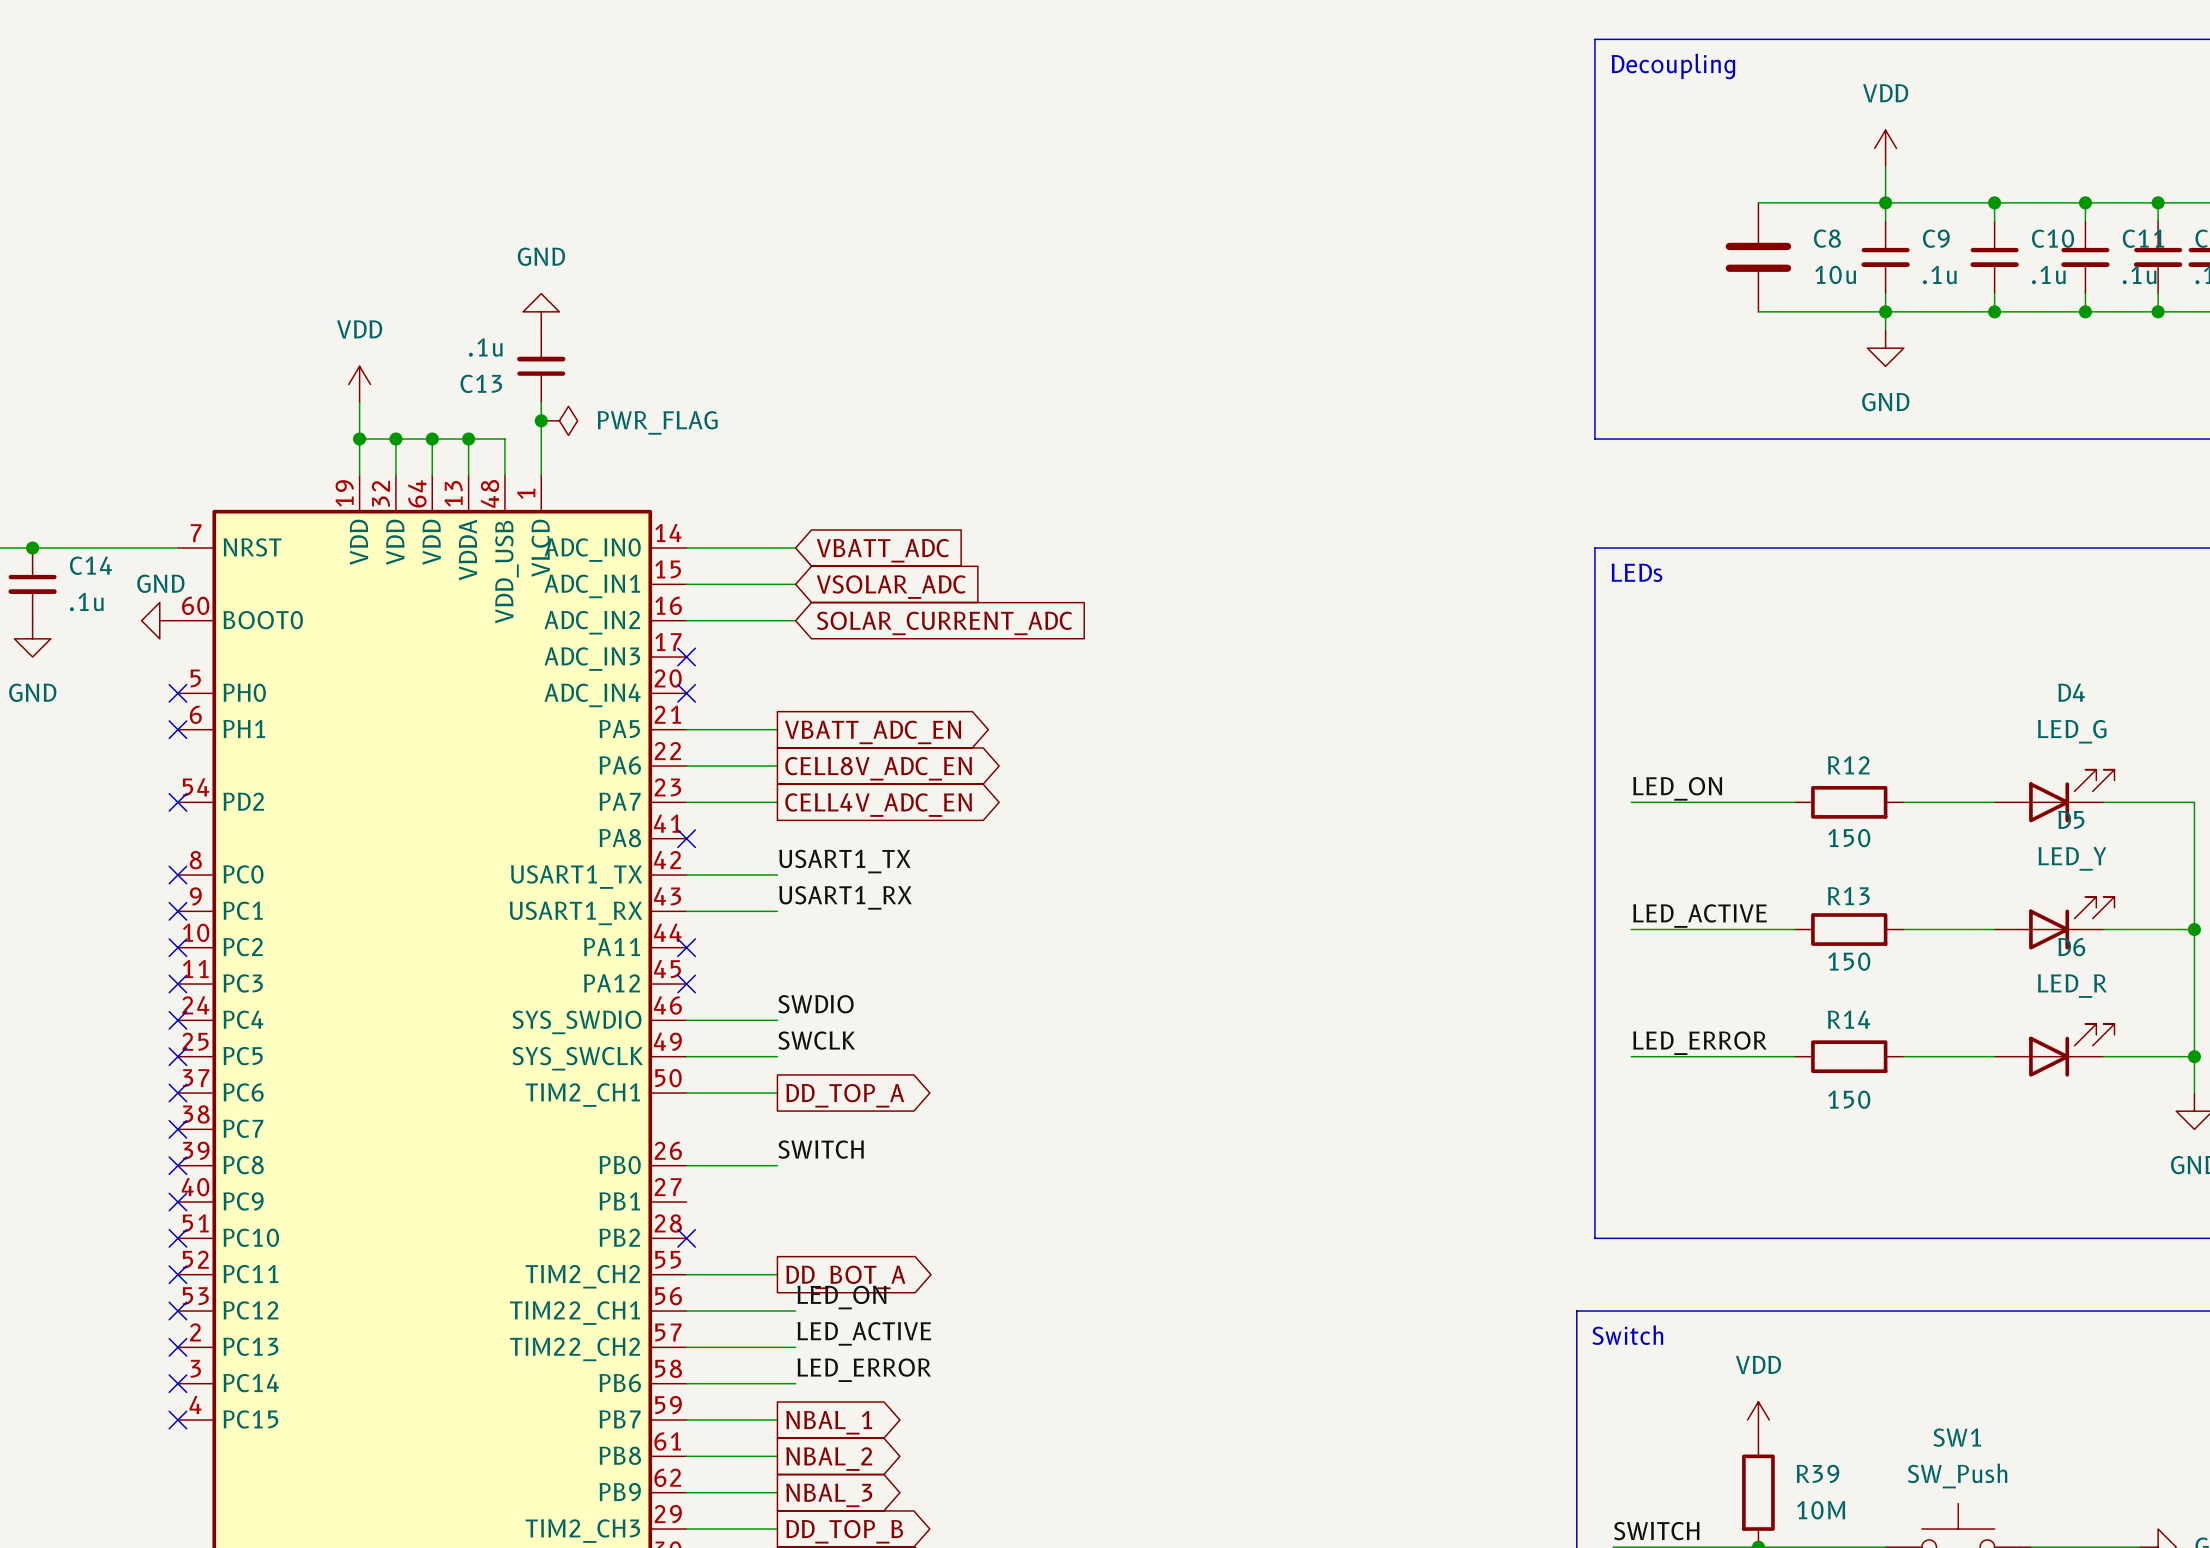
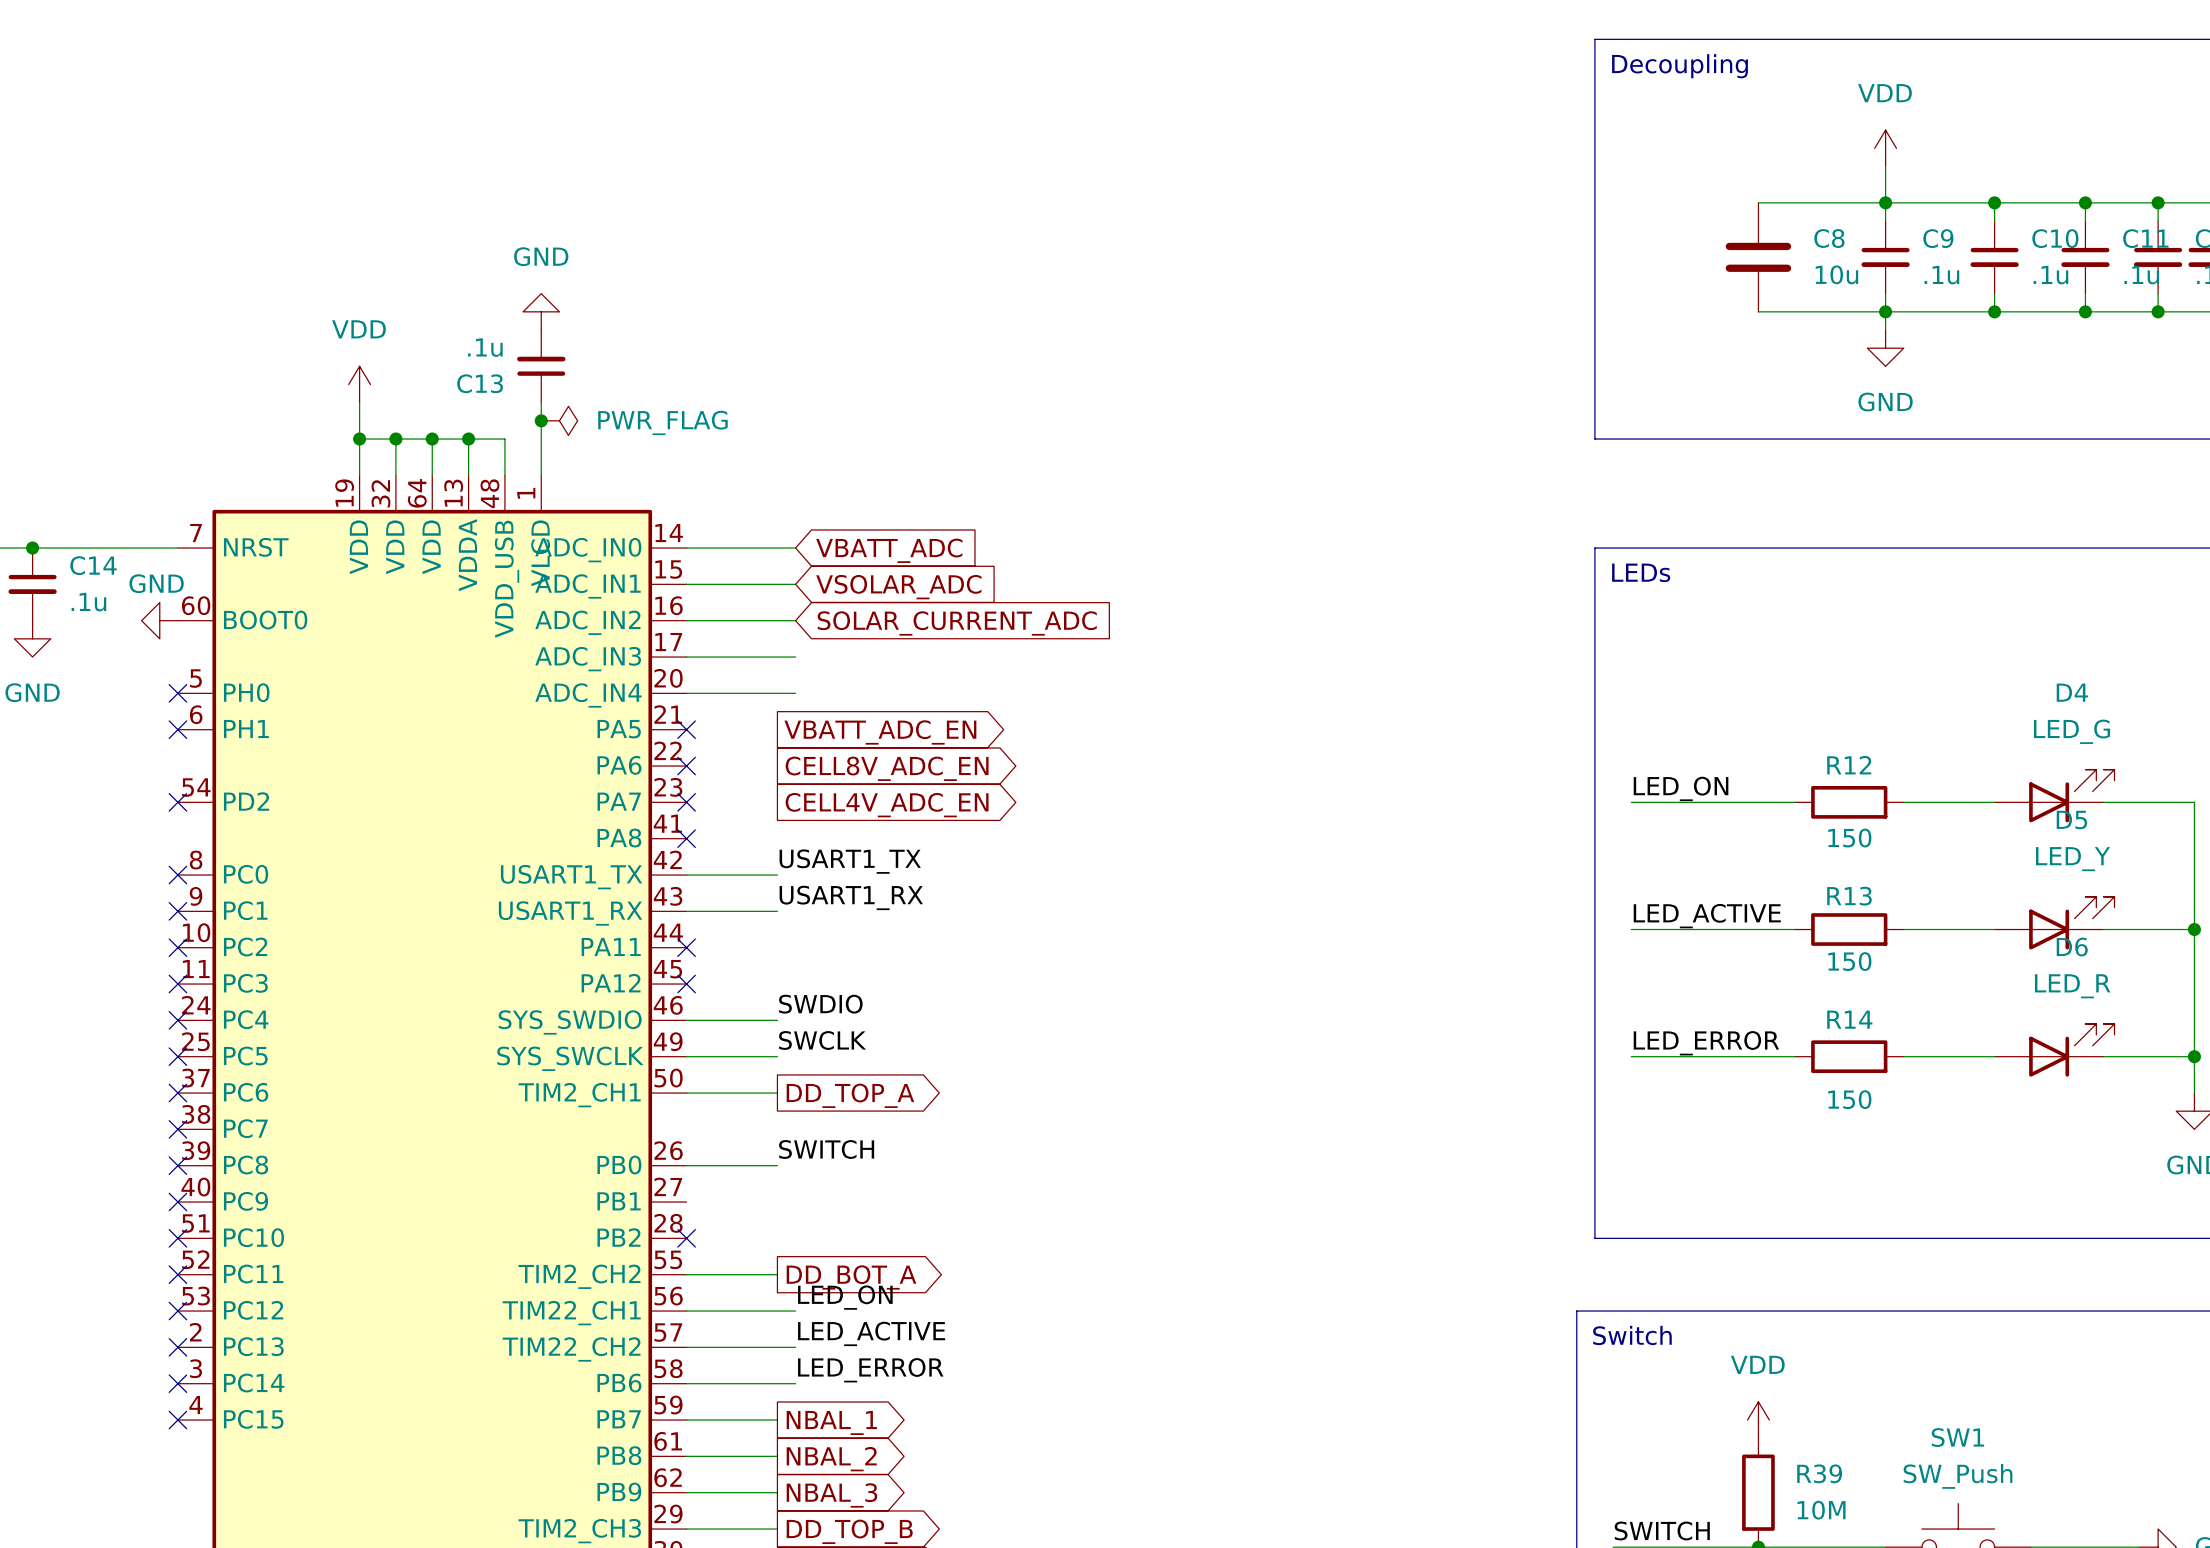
wire: none -> (686, 657) (795, 657)
no-connect mark: (686, 657) -> none
wire: none -> (686, 693) (795, 693)
no-connect mark: (686, 693) -> none
wire: (686, 729) (777, 729) -> none
no-connect mark: none -> (686, 729)
wire: (686, 766) (777, 766) -> none
no-connect mark: none -> (686, 766)
wire: (686, 802) (777, 802) -> none
no-connect mark: none -> (686, 802)

